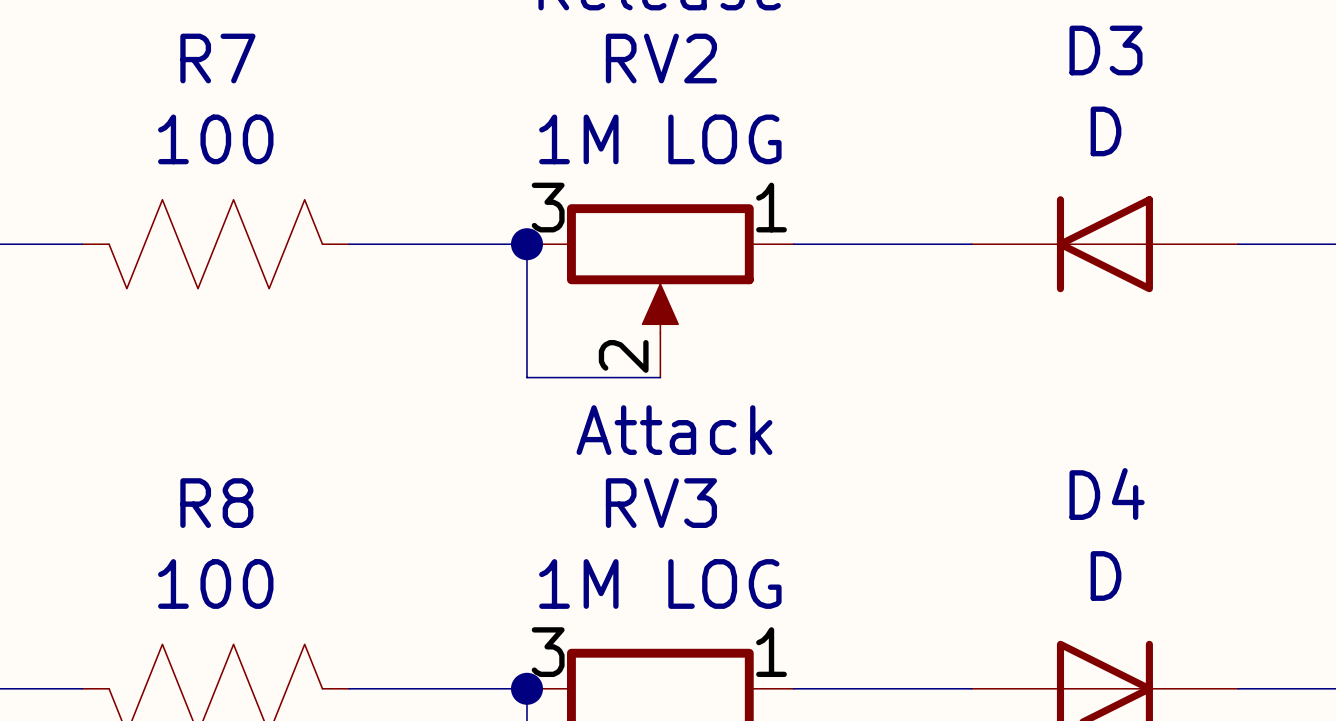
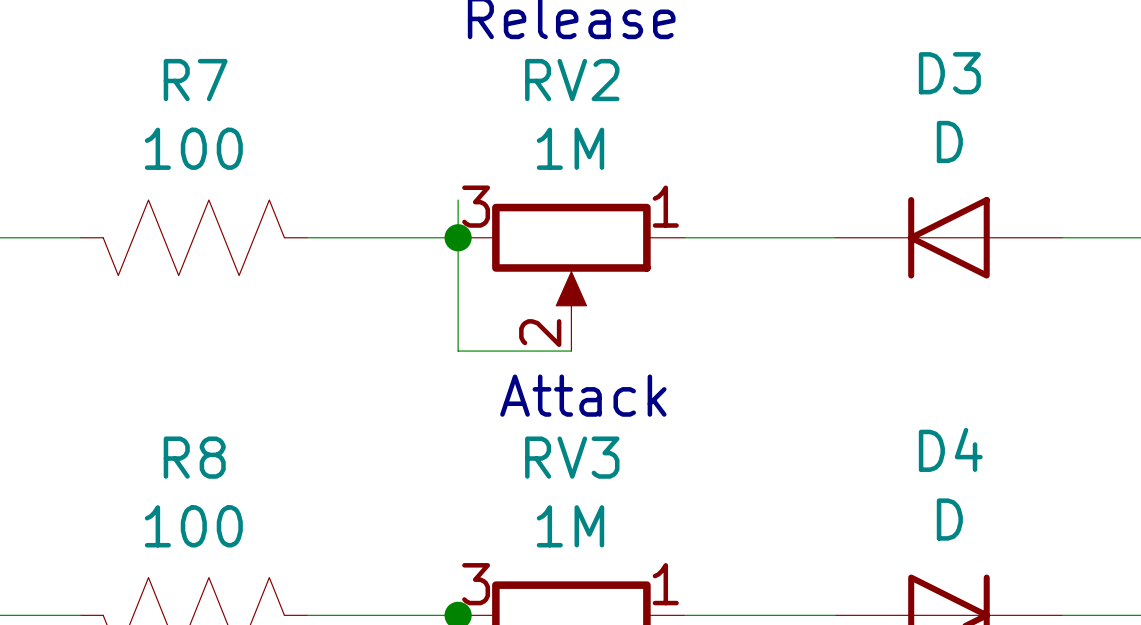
RV2 value: 1M LOG (660, 139) -> 1M (570, 148)
wire: none -> (458, 200) (458, 237)
RV3 value: 1M LOG (660, 583) -> 1M (570, 526)

